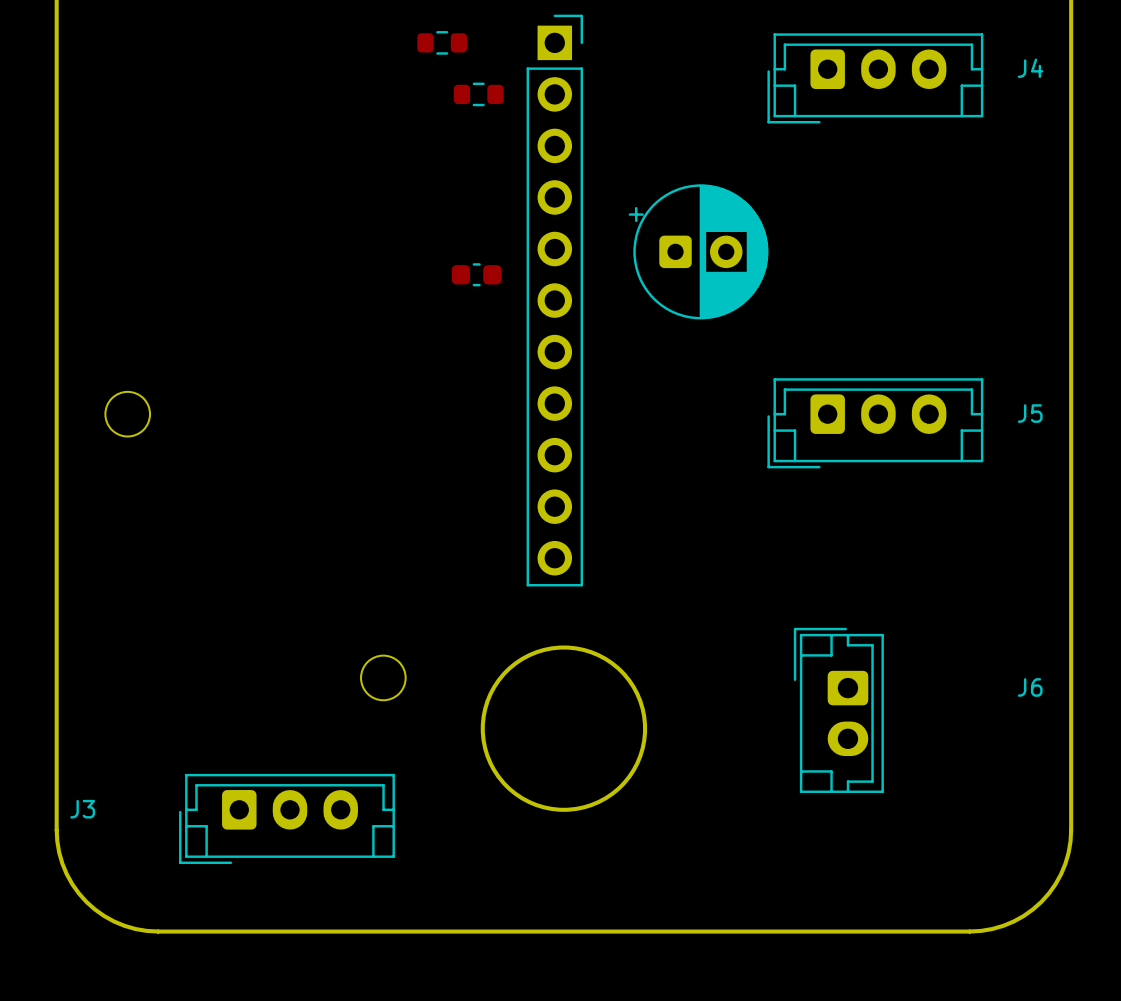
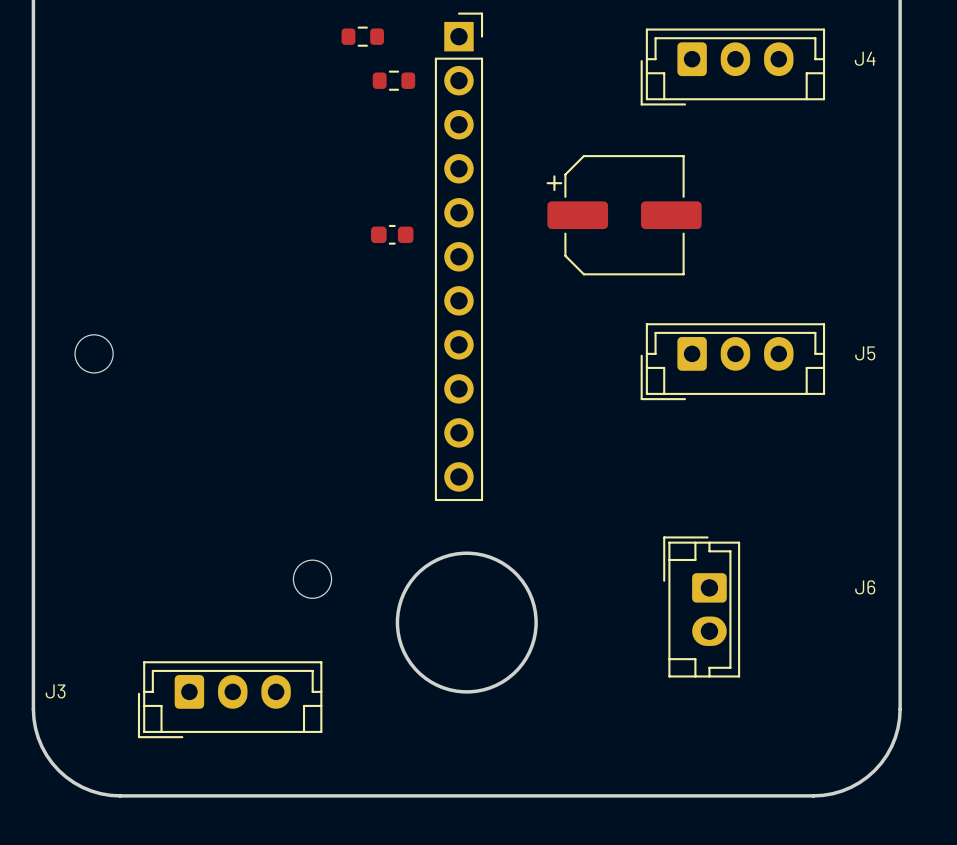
part: (698, 251) -> none
part: none -> (624, 215)

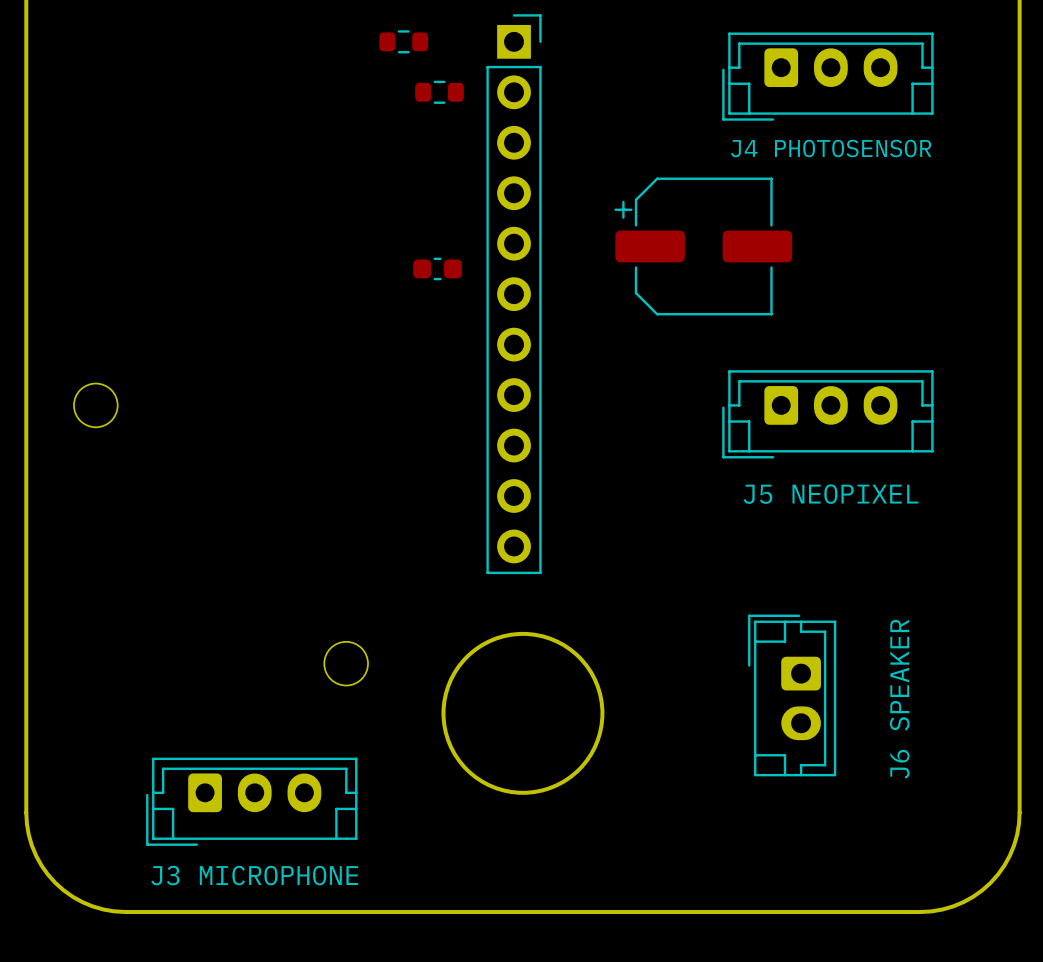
text: J4 (865, 58) -> none
text: none -> J4 PHOTOSENSOR (831, 148)
text: J5 (865, 353) -> none
text: none -> J5 NEOPIXEL (831, 494)
text: J6 (865, 587) -> none
text: none -> J6 SPEAKER (899, 699)
text: J3 (55, 691) -> none
text: none -> J3 MICROPHONE (254, 875)

